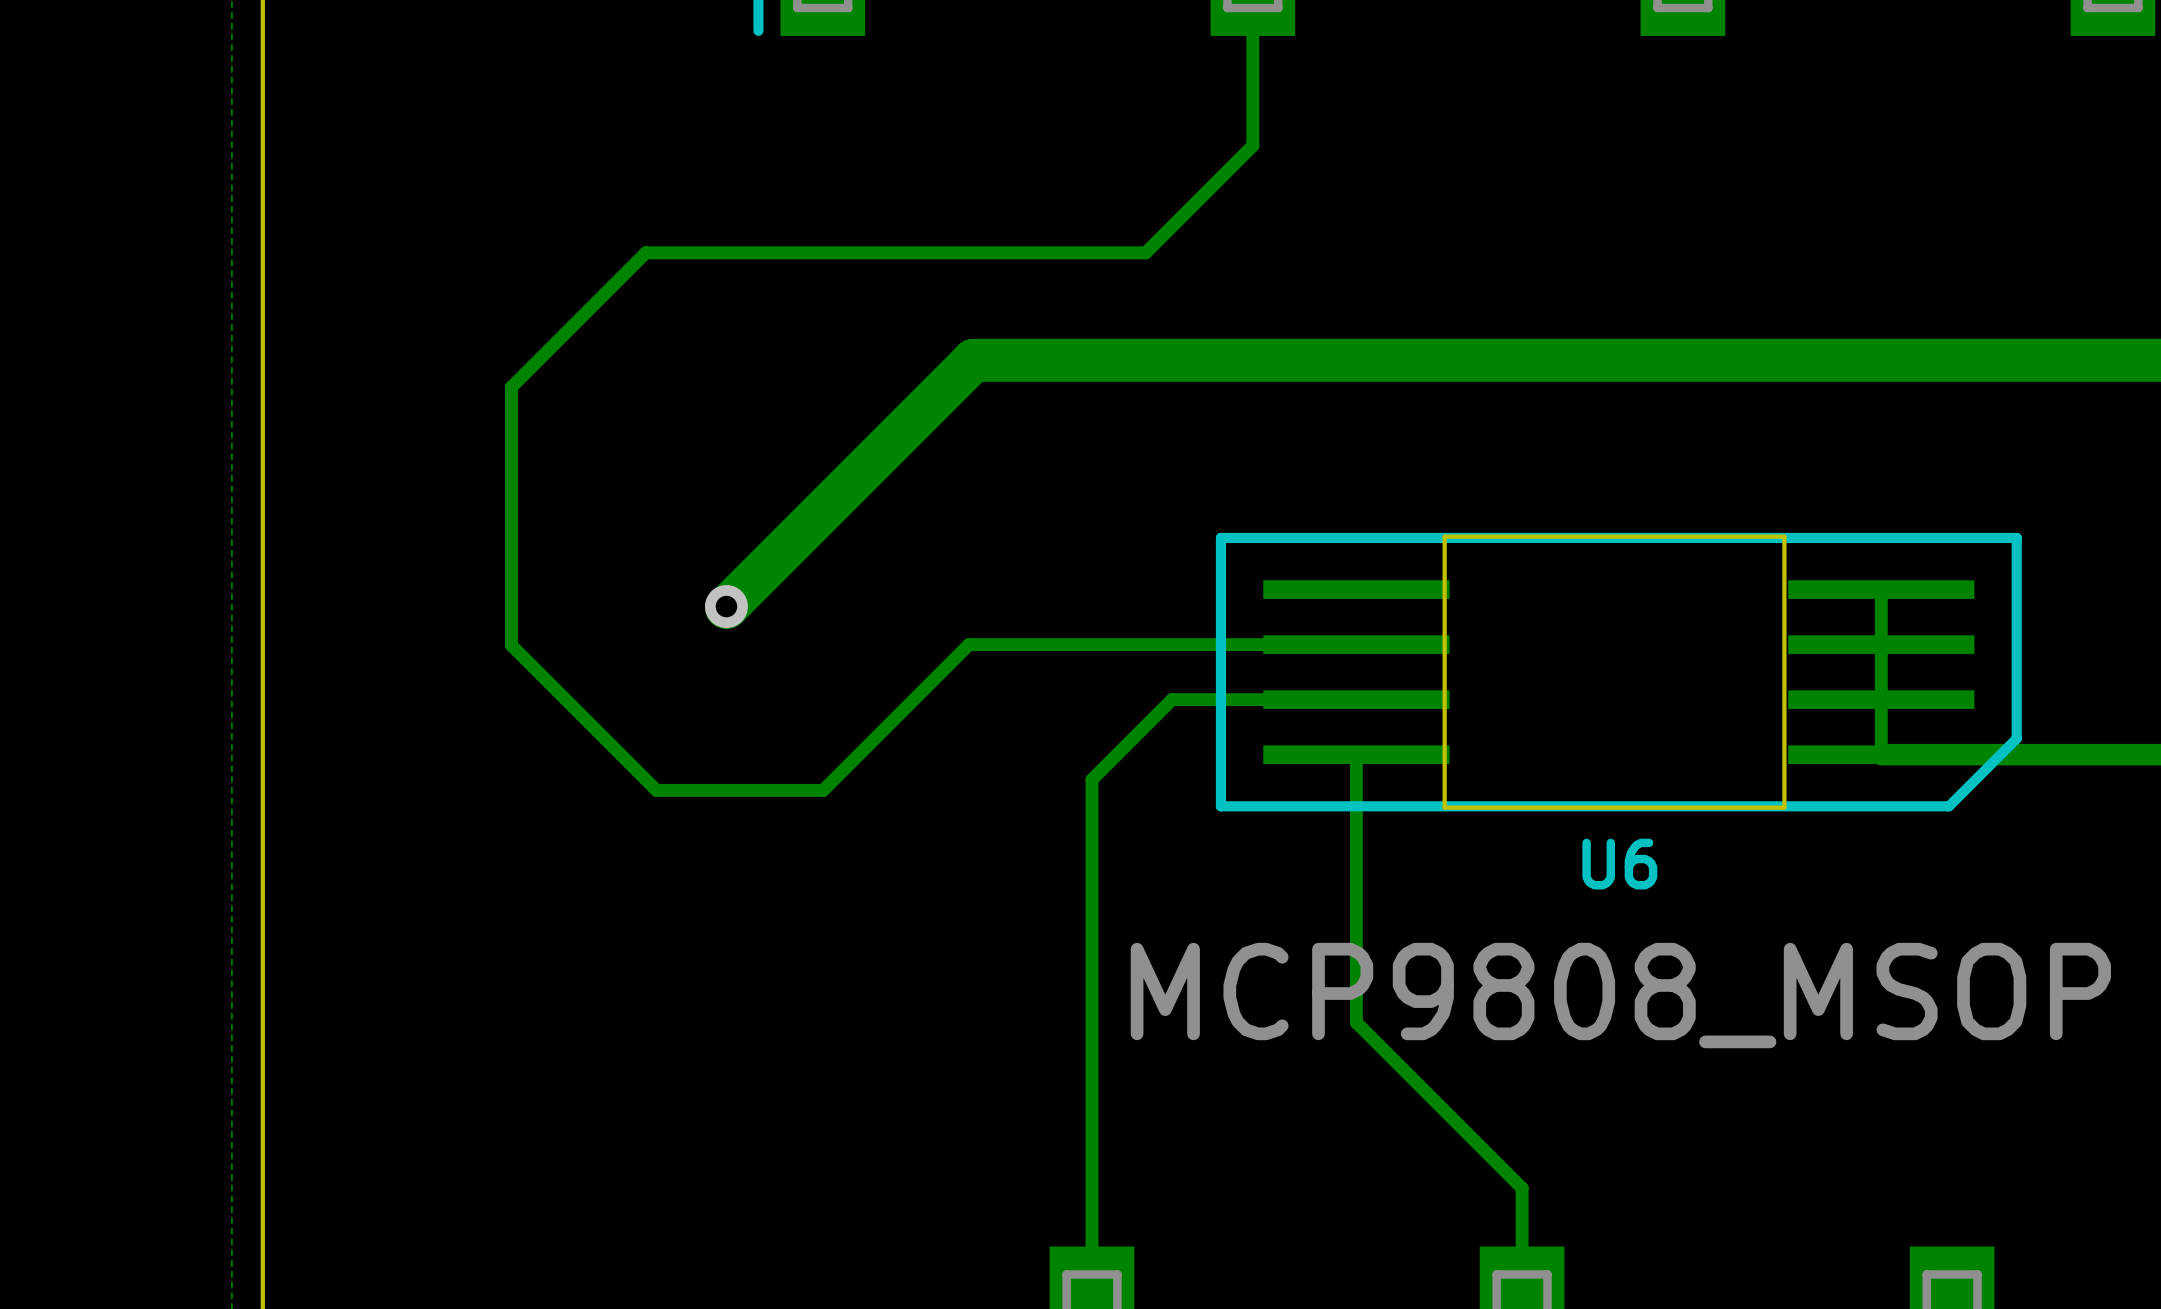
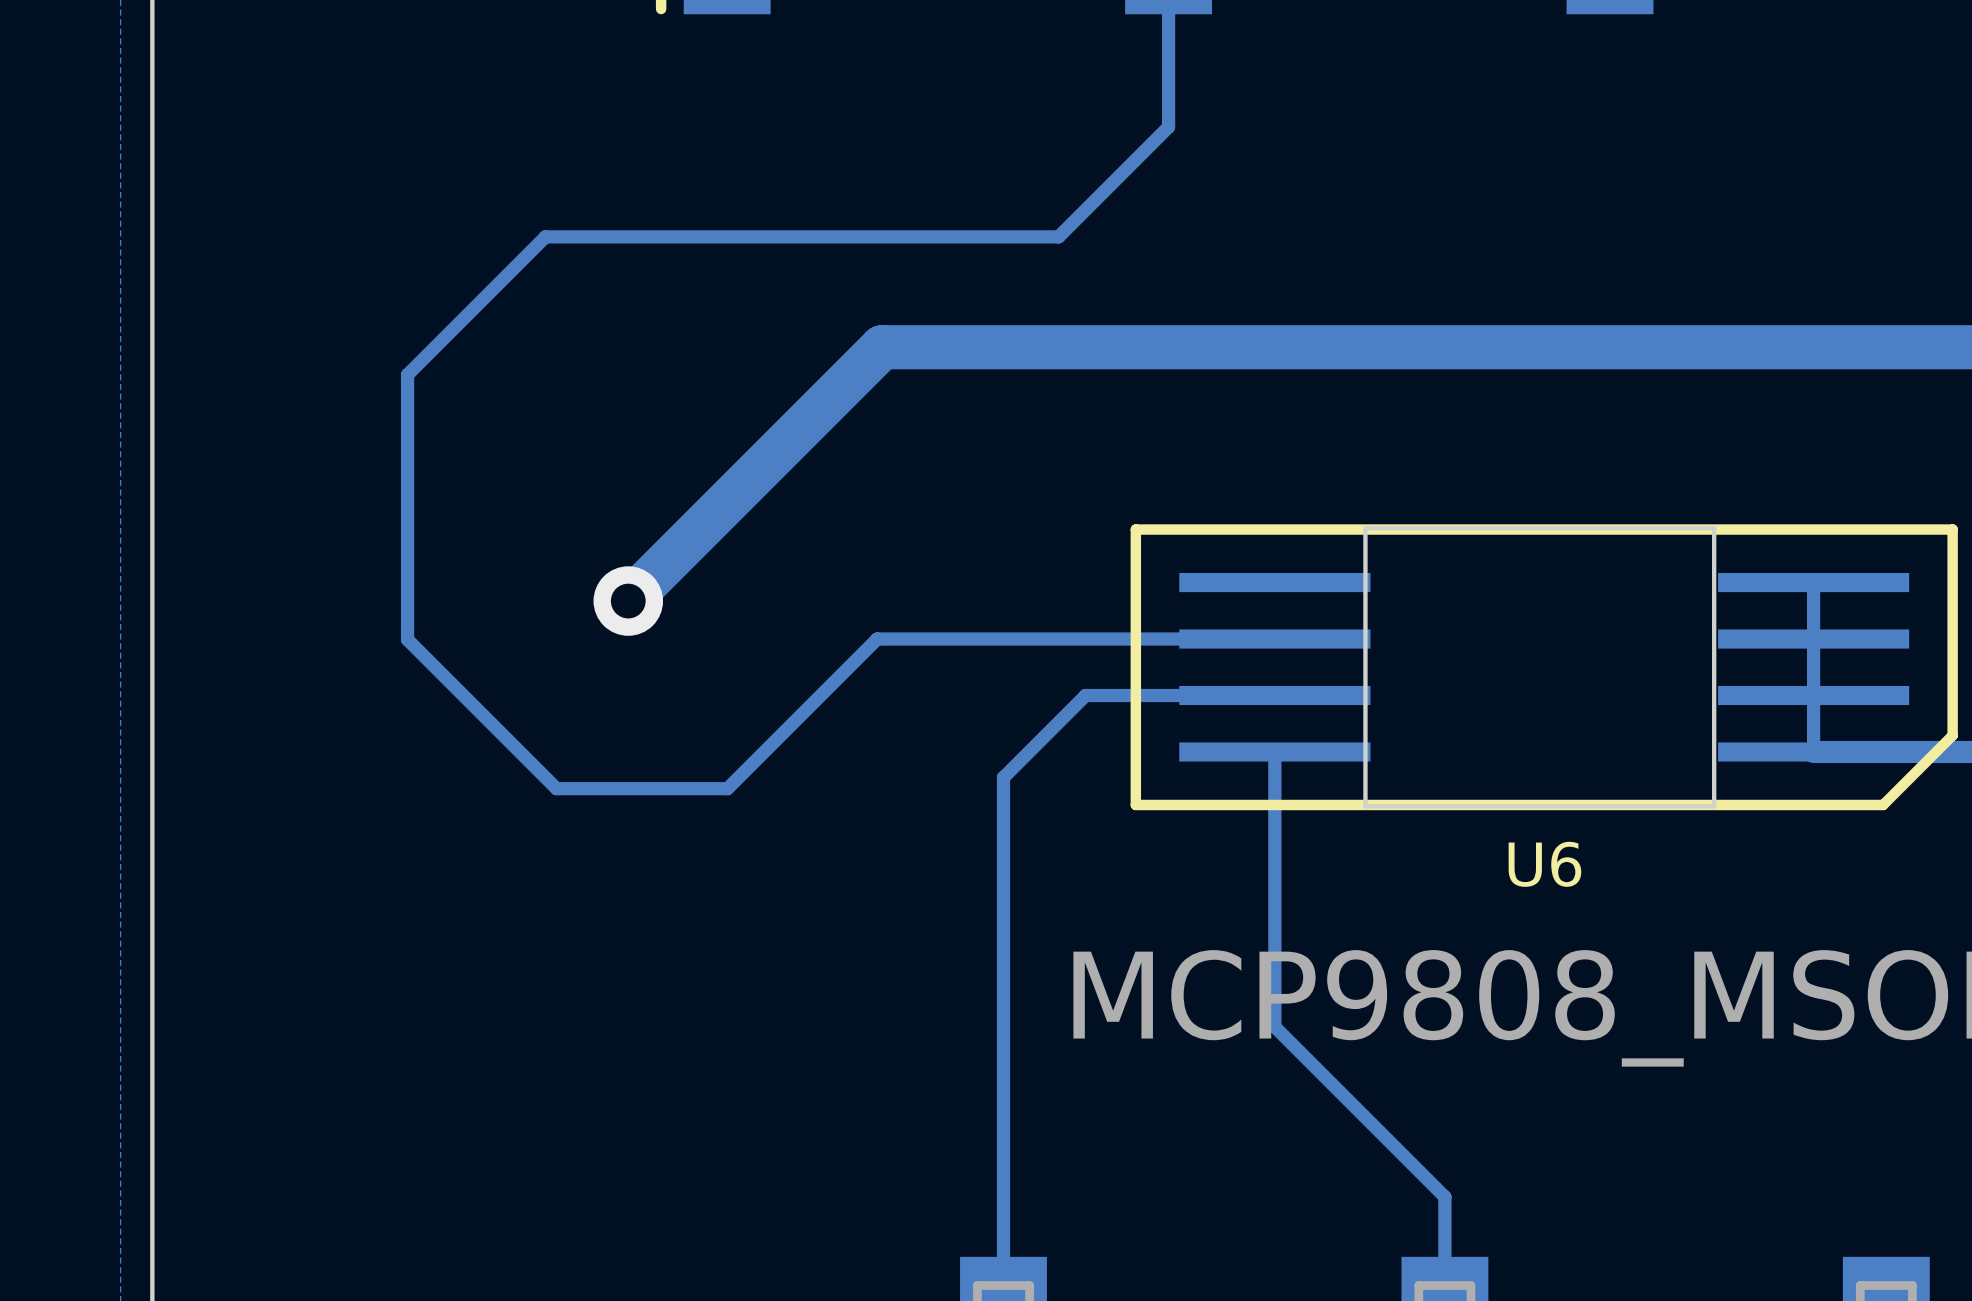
via size: [704, 585, 748, 629] -> [593, 566, 664, 636]

